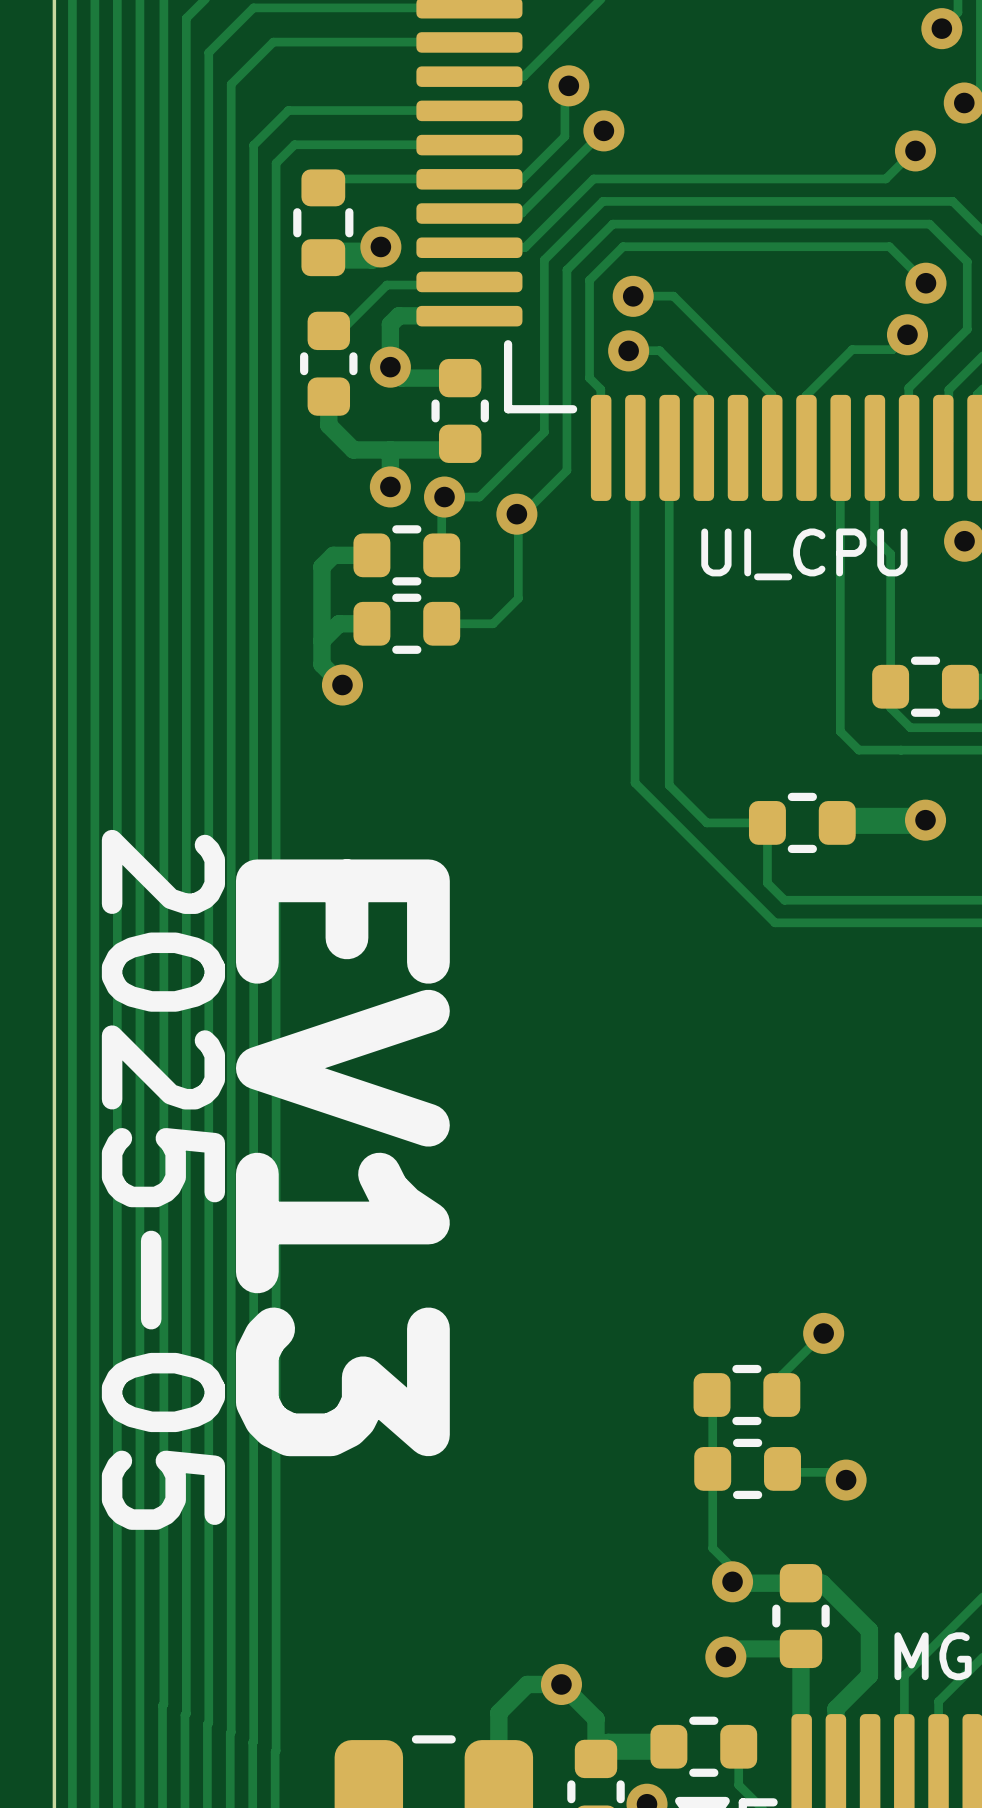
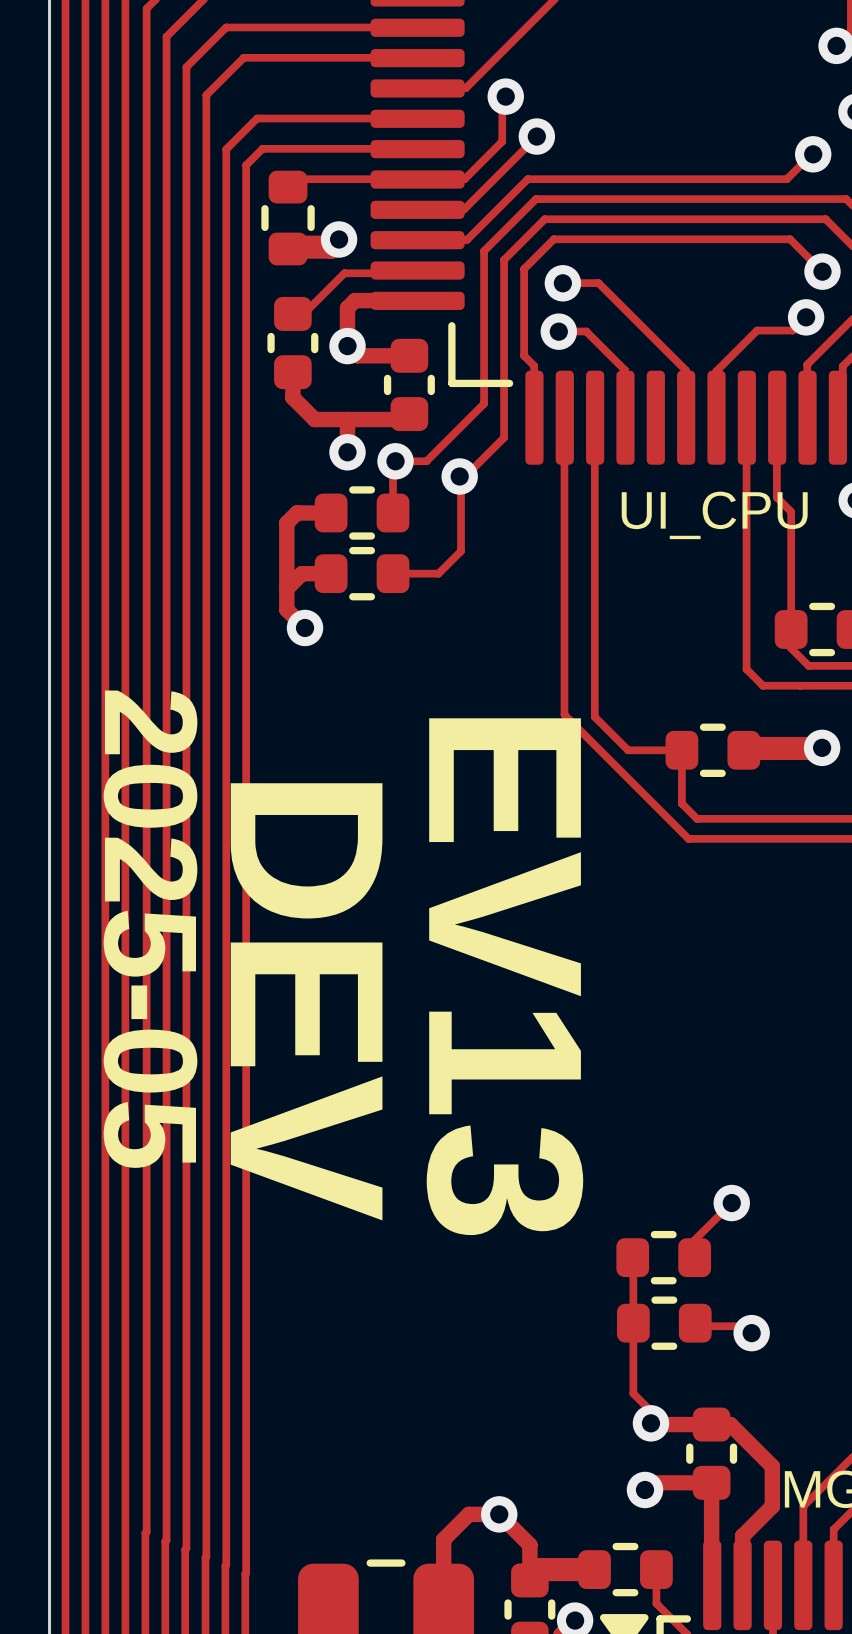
text: none -> EV13 (504, 976)
text: EV13 (342, 1157) -> DEV (306, 1001)
text position: 2025-05 (163, 1179) -> 2025-05 (150, 929)

